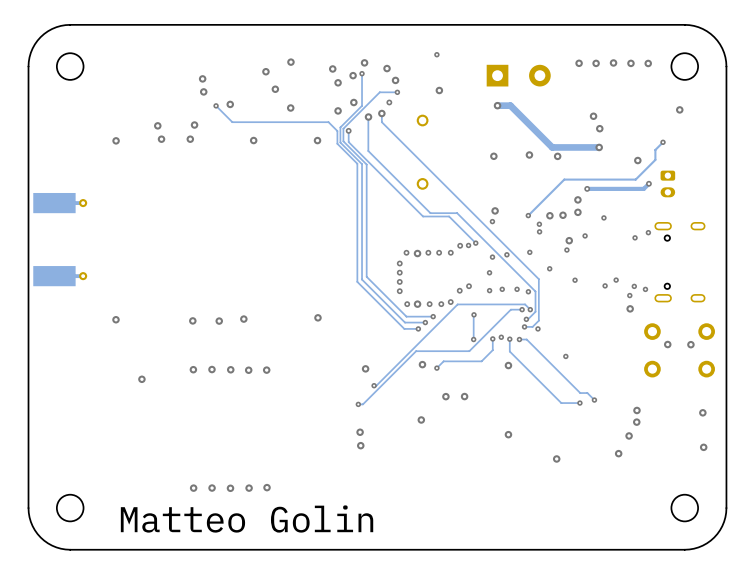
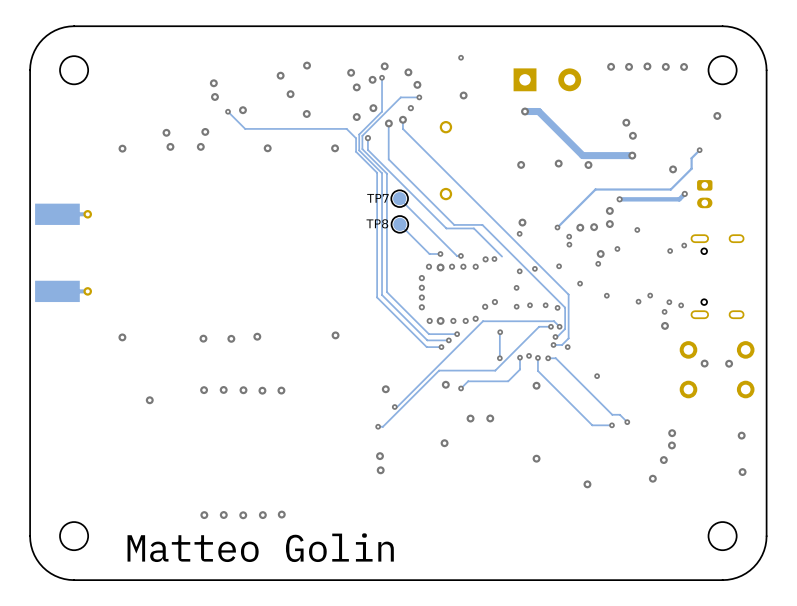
track: none -> (399, 198) (456, 255) (460, 255)
TP7: none -> (399, 198)
track: none -> (399, 224) (429, 254) (440, 254)
TP8: none -> (399, 224)
via: none -> (440, 254)
via: none -> (460, 255)
via: (475, 243) -> none

